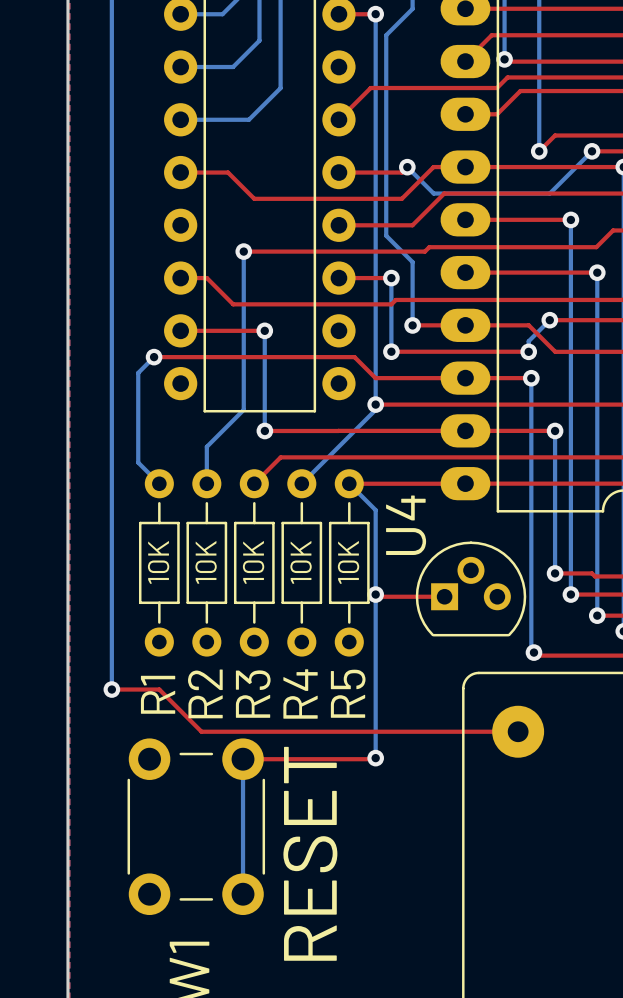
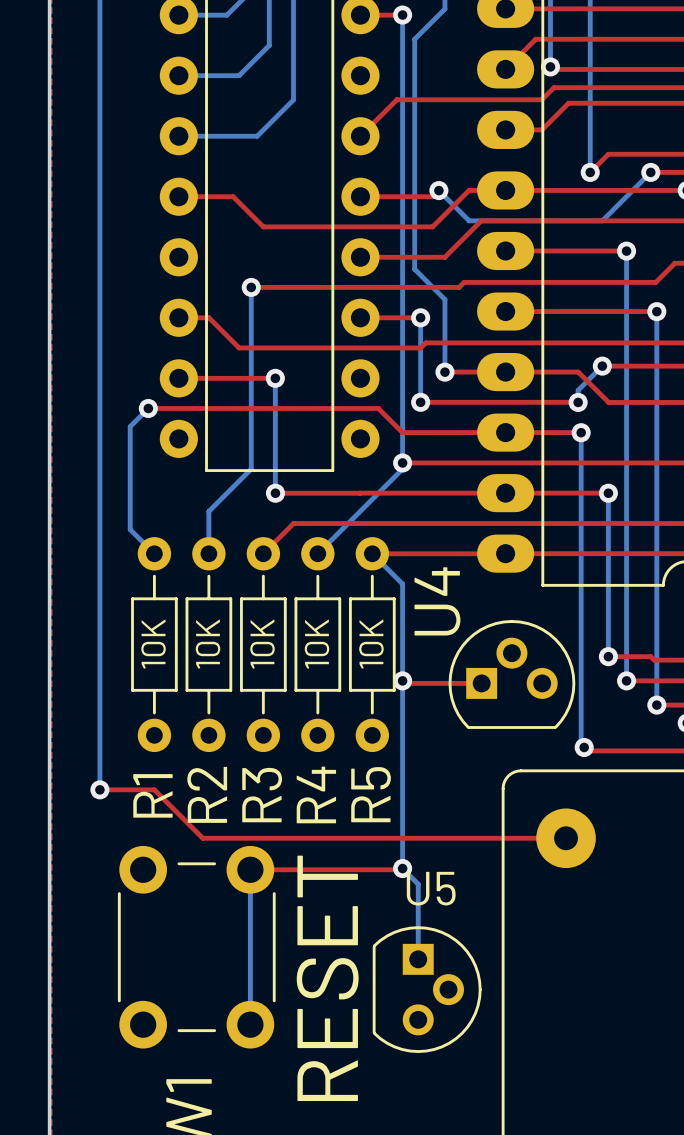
bottom track: none -> (402, 868) (418, 884) (418, 959)
U5: none -> (427, 989)

